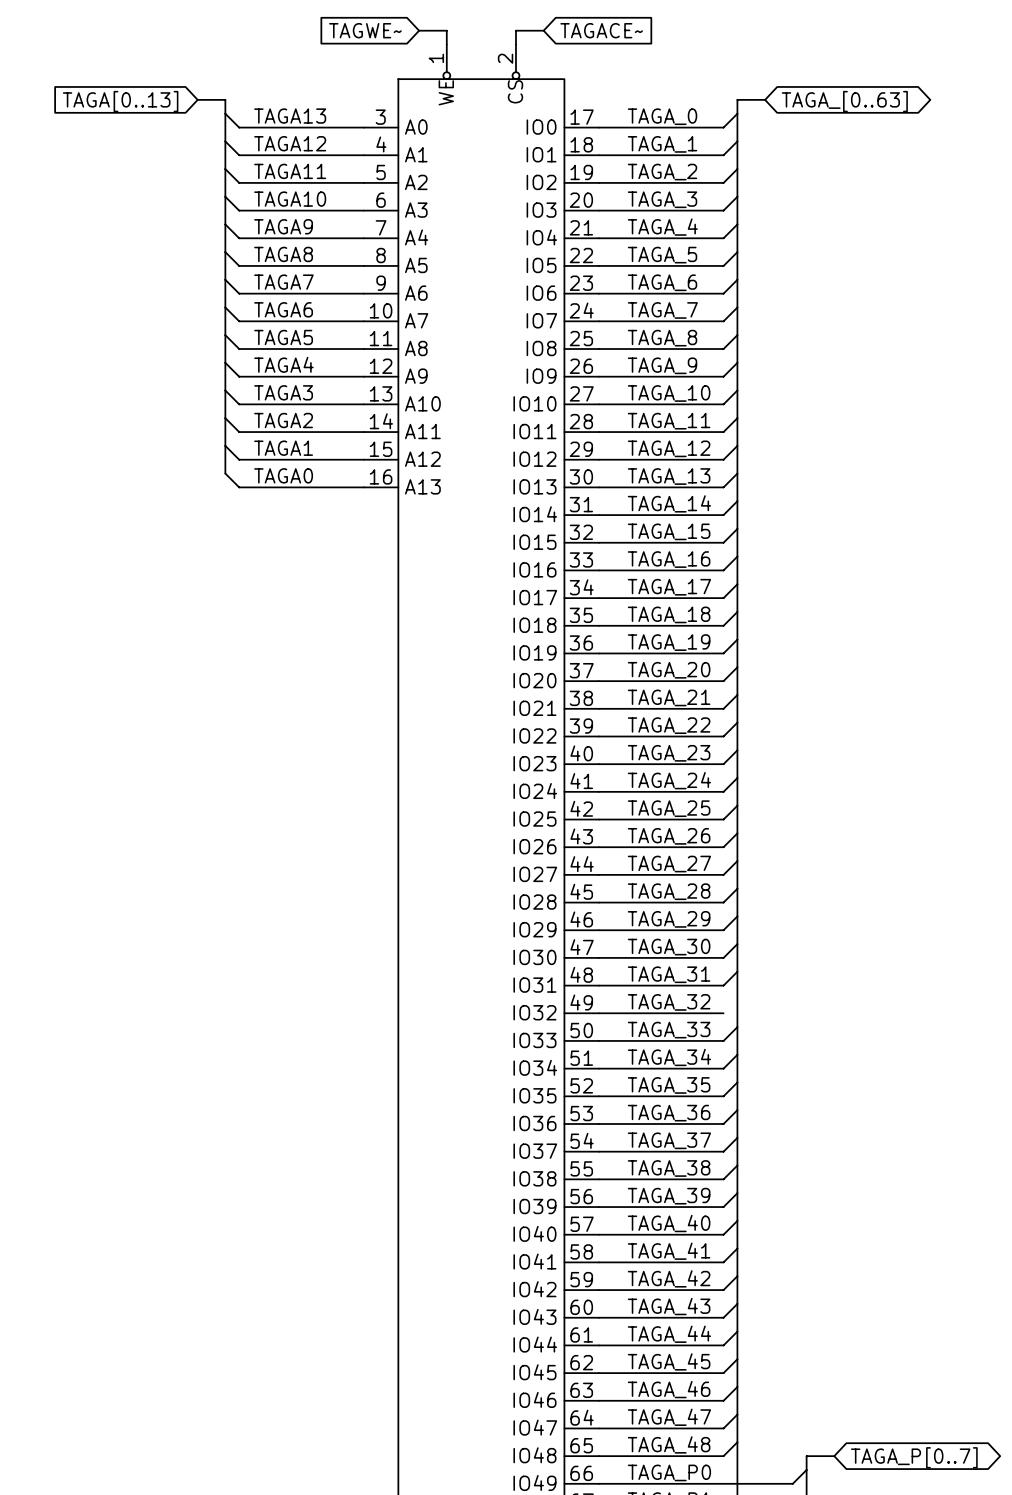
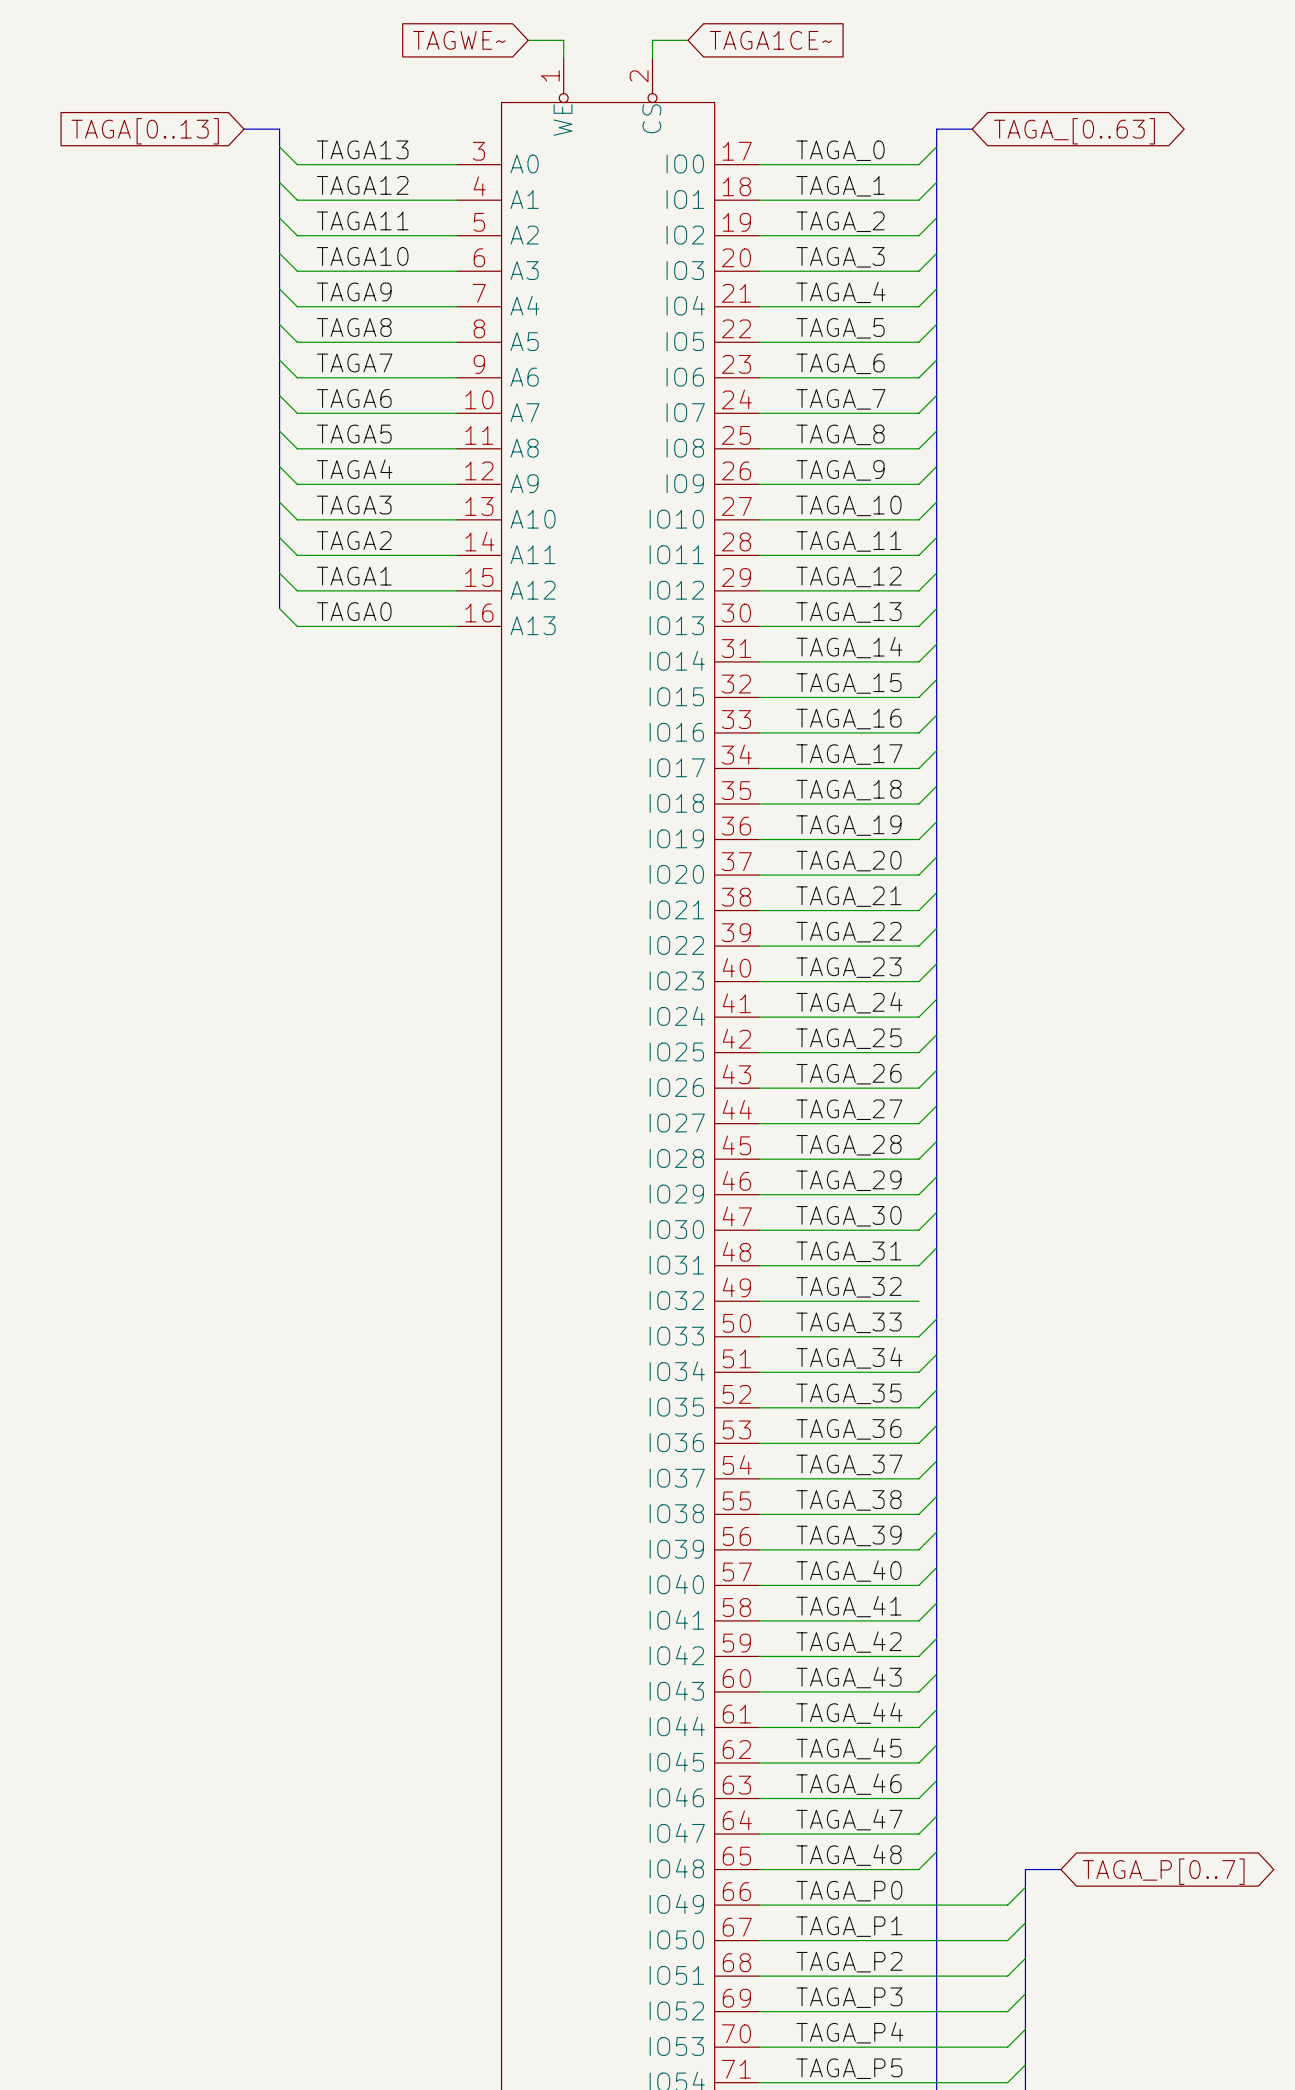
global label: TAGACE~ (601, 30) -> TAGA1CE~ (770, 40)

